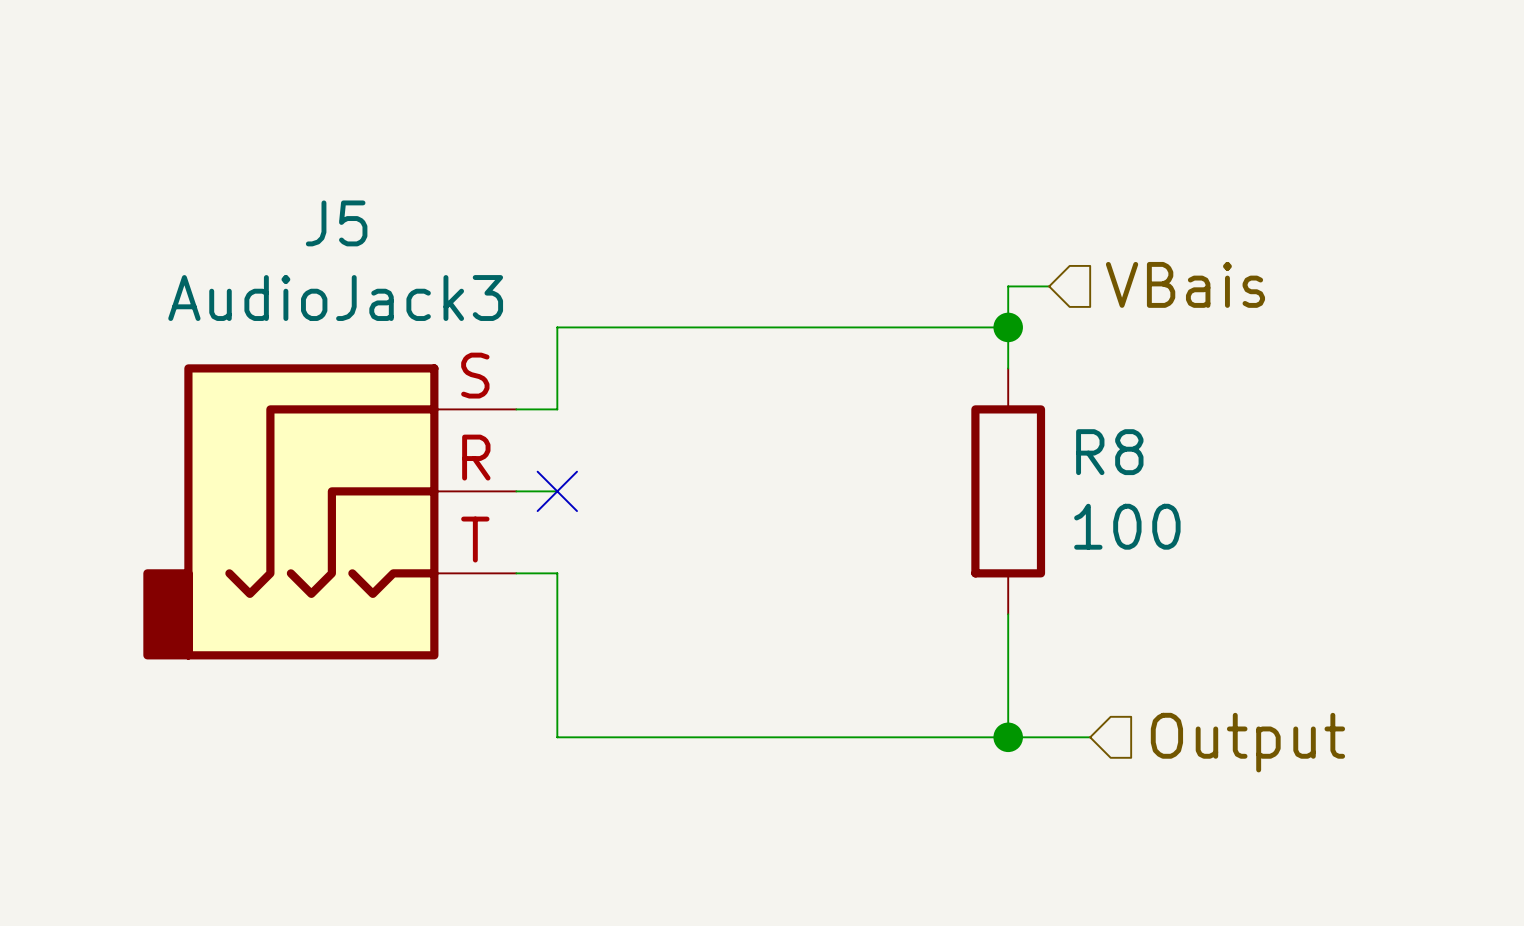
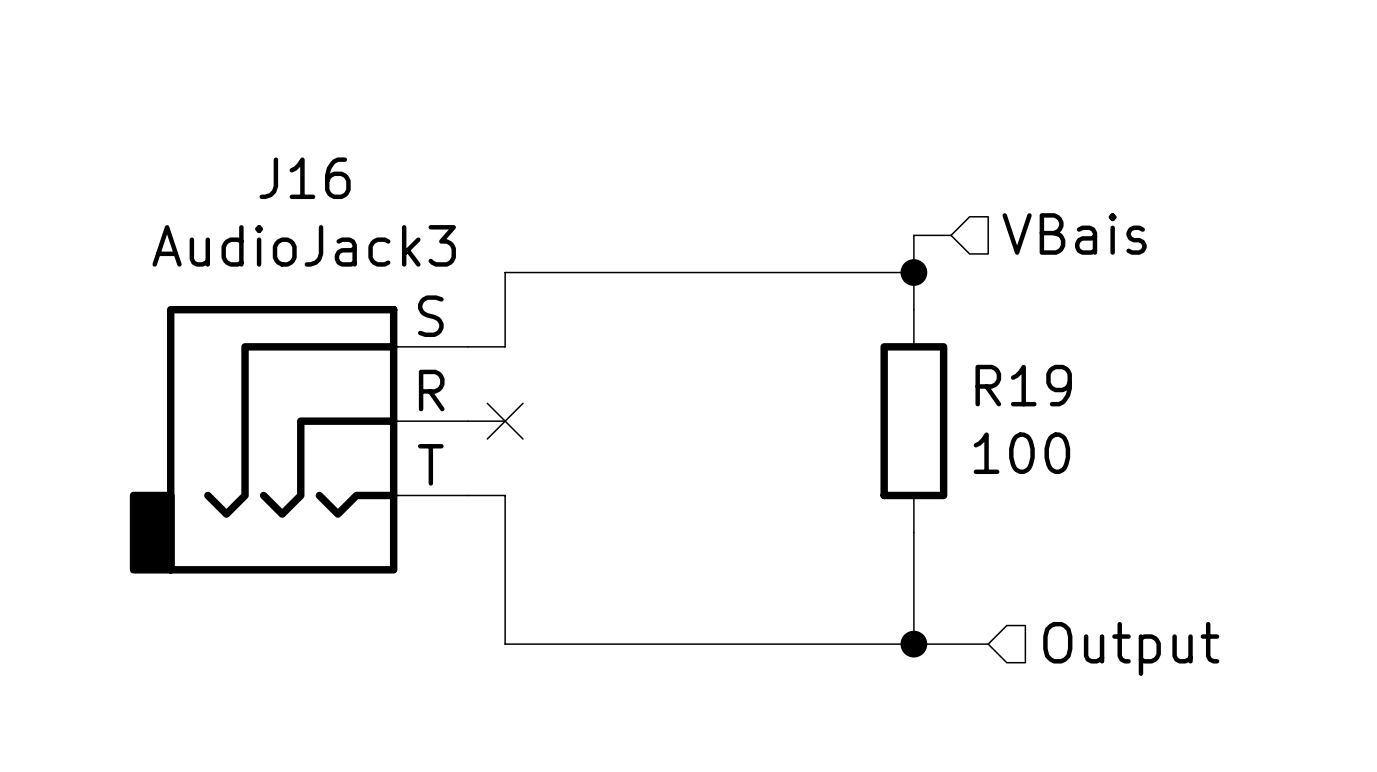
J5 name: J5 (336, 223) -> J16 (305, 178)
R8 name: R8 (1109, 452) -> R19 (1023, 385)

